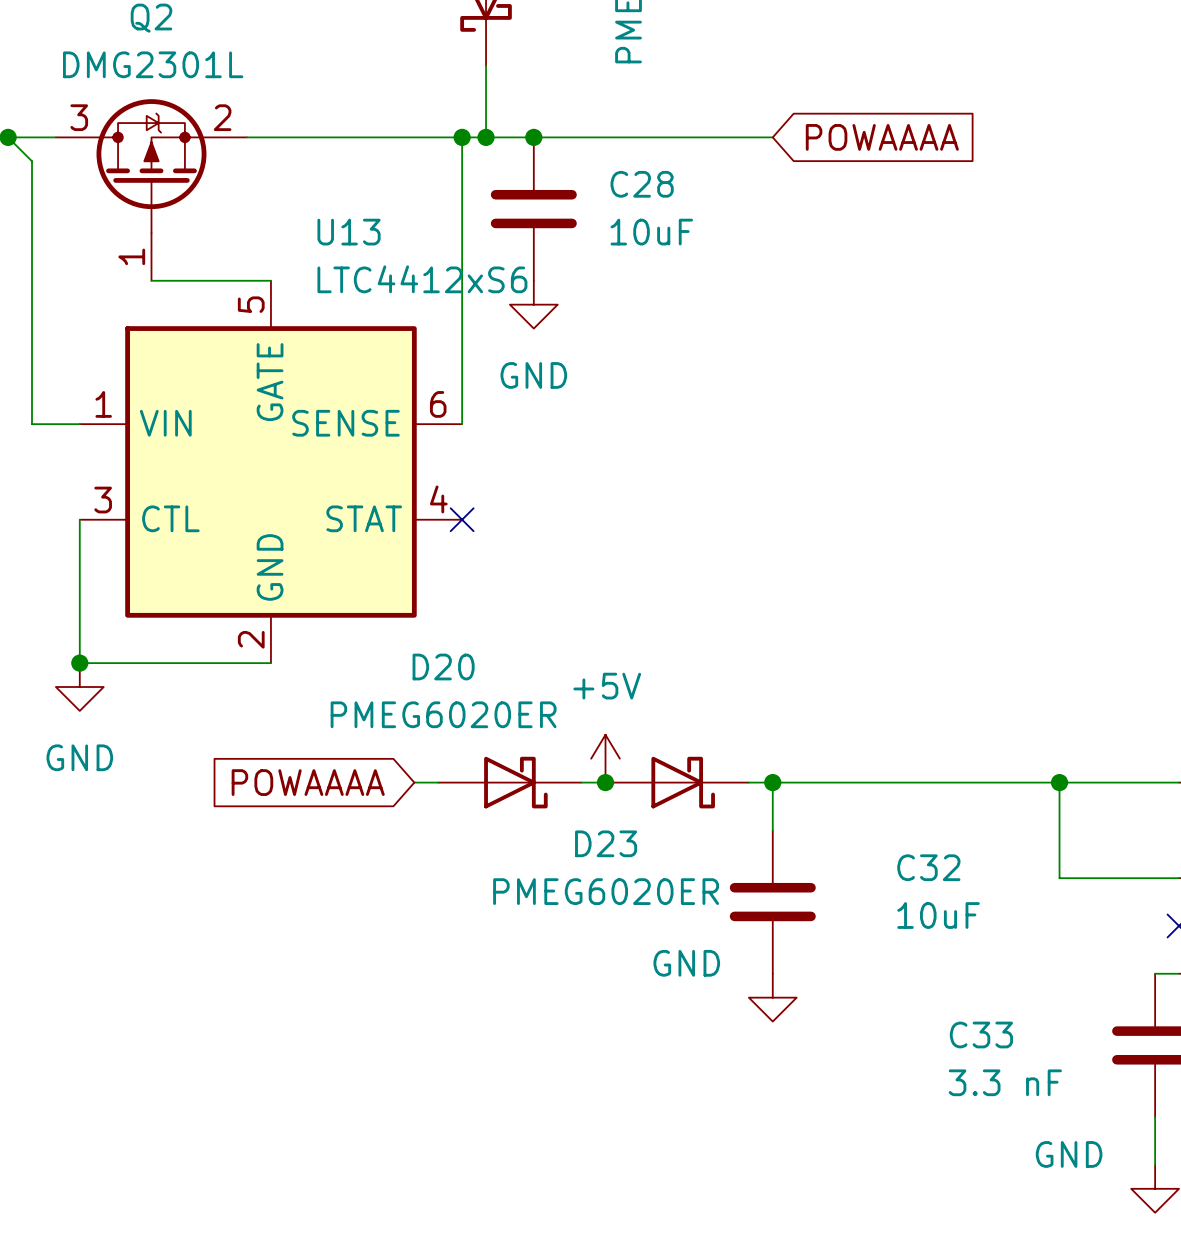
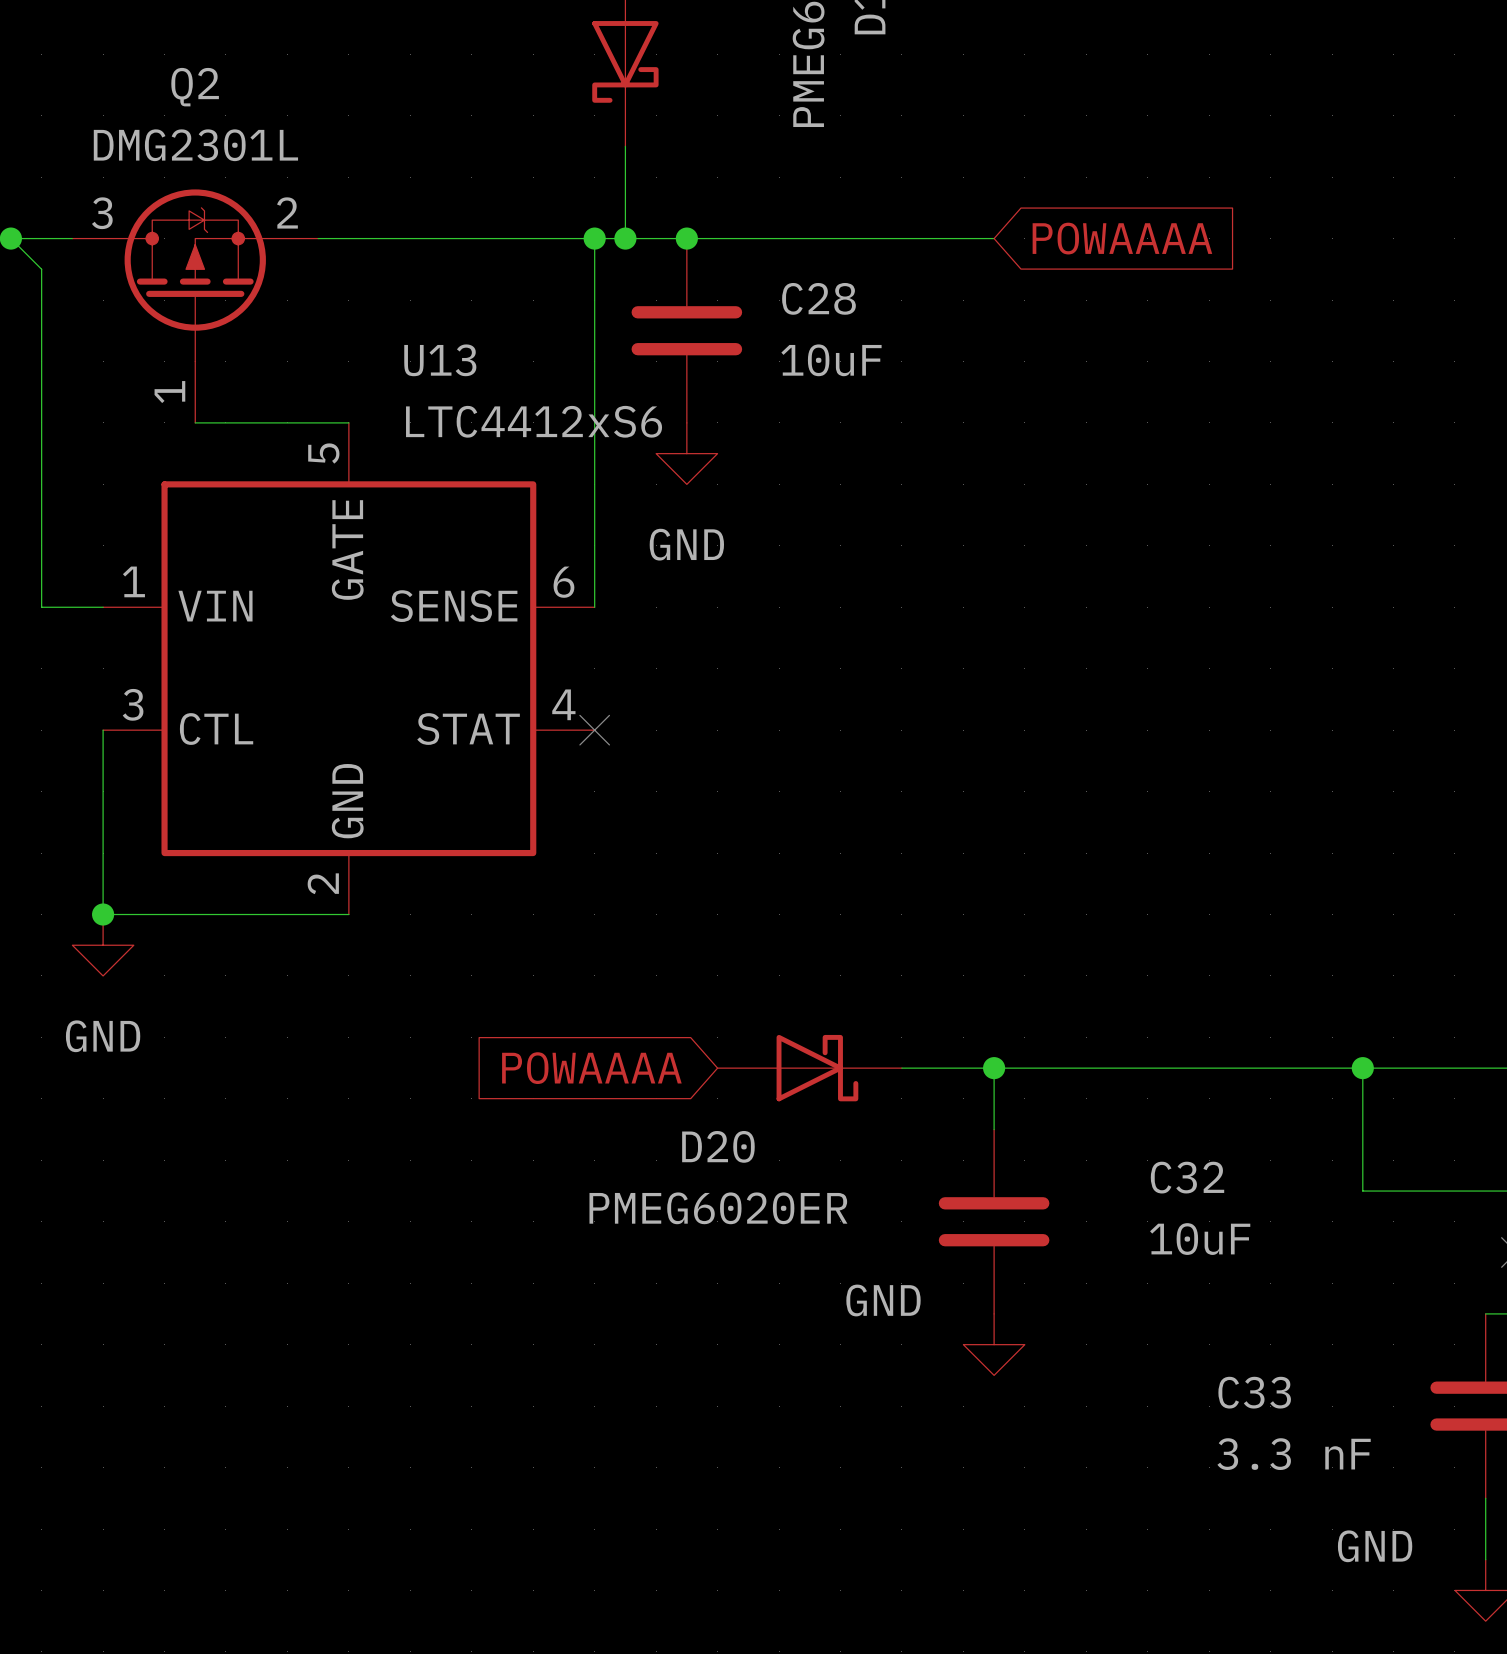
D20 name position: D20 (443, 666) -> D20 (718, 1146)
D20 value position: PMEG6020ER (443, 714) -> PMEG6020ER (718, 1208)
power symbol: +5V (605, 758) -> none
global label position: POWAAAA (308, 782) -> POWAAAA (591, 1068)
wire: (414, 782) (438, 782) -> none
D20 position: (509, 782) -> (809, 1068)
junction: (605, 782) -> none
D23: PMEG6020ER (677, 782) -> none

